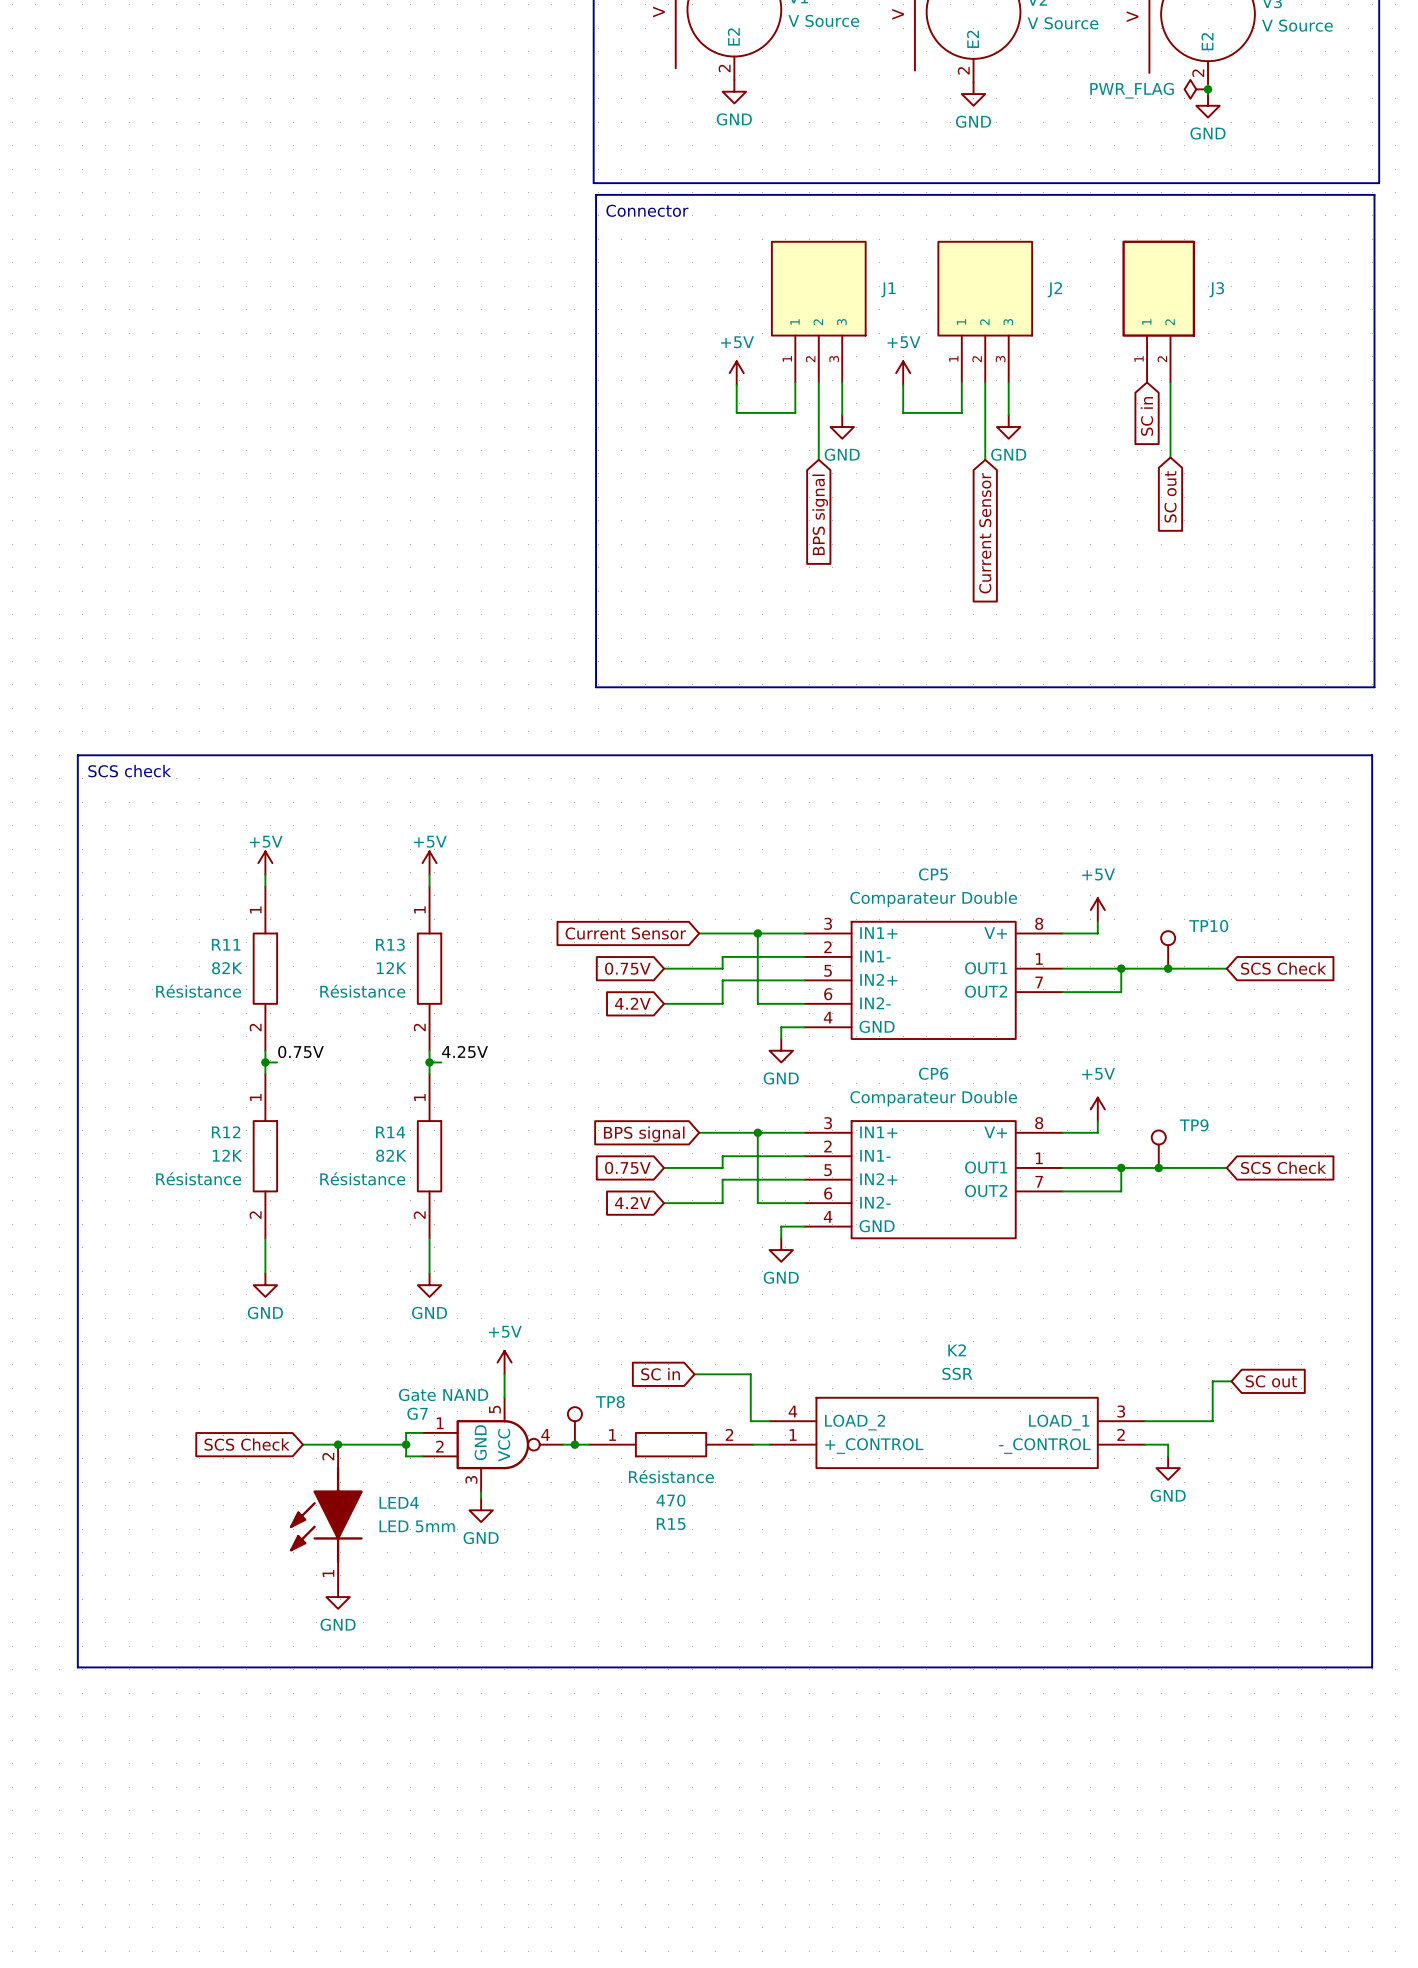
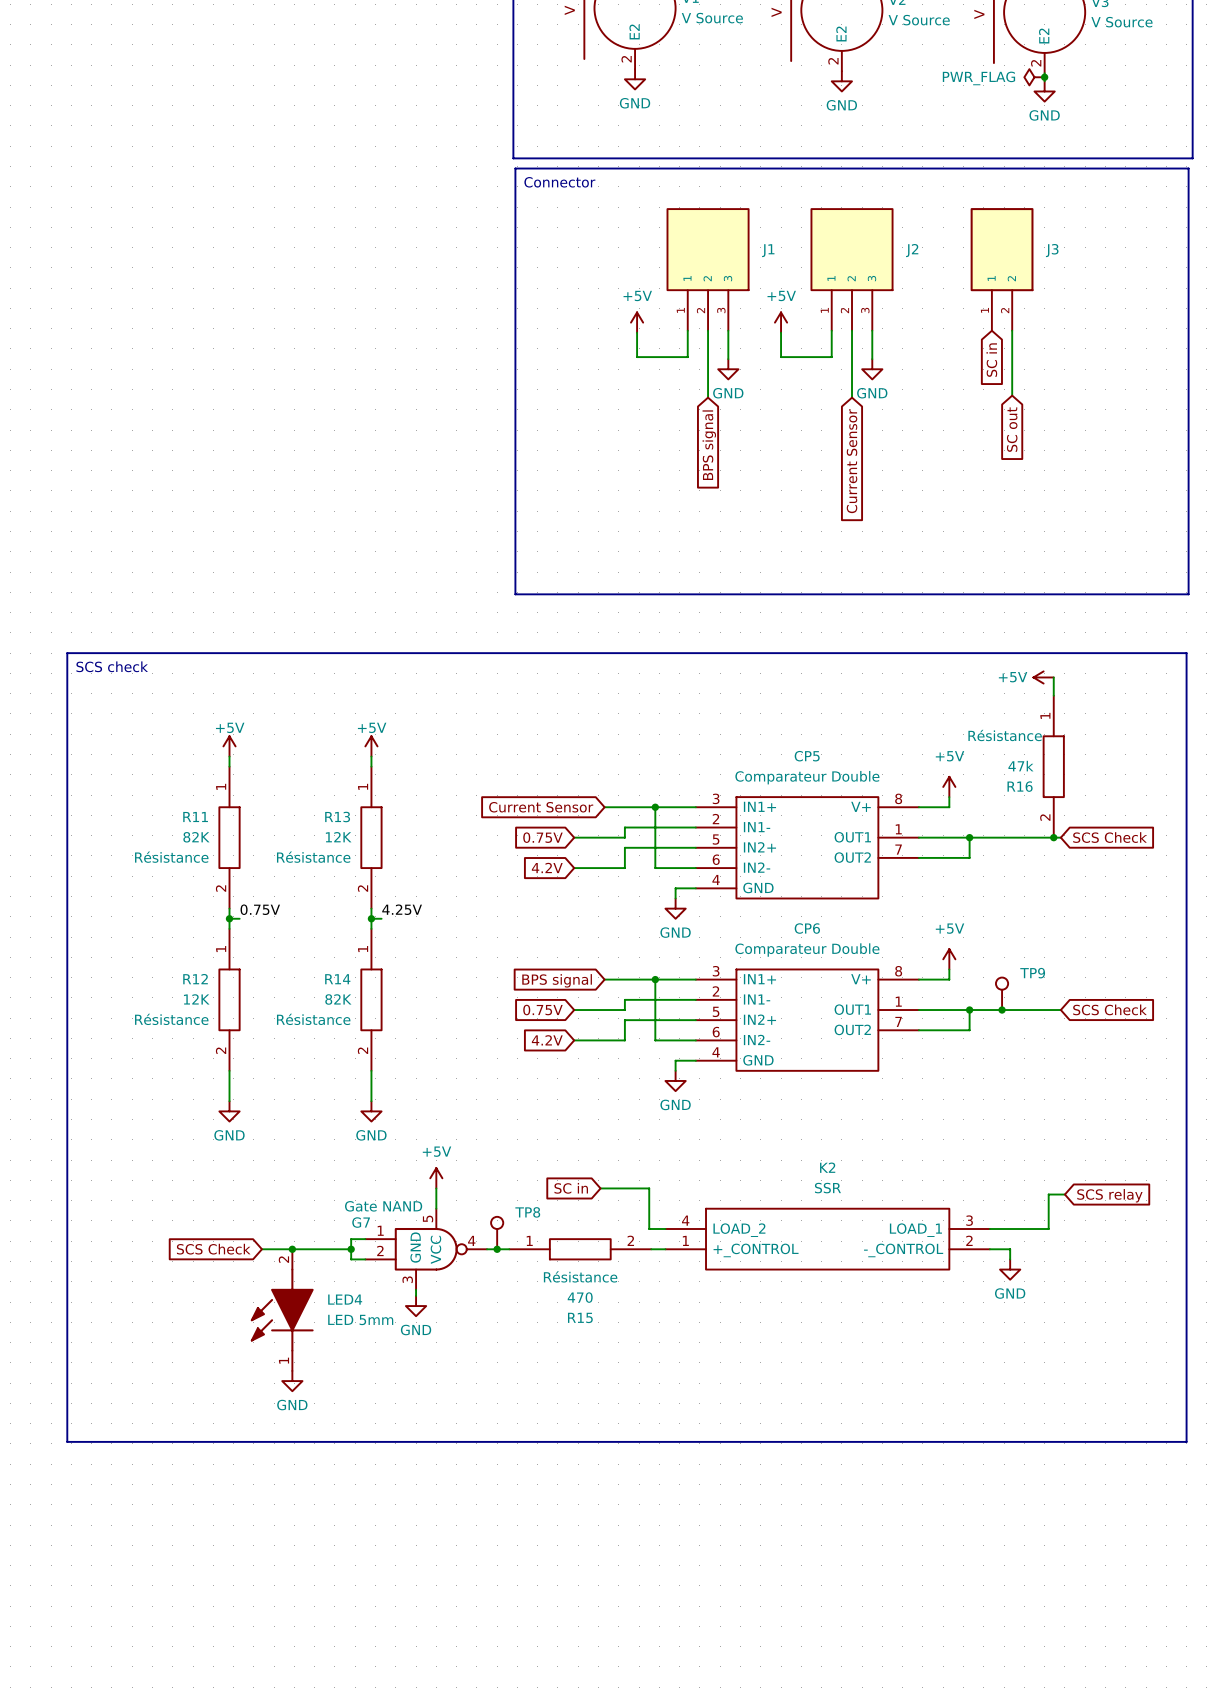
power symbol: none -> +5V (1043, 677)
wire: none -> (1053, 677) (1053, 695)
R16: none -> 47k (1053, 766)
TP10: (1168, 949) -> none
junction position: (1168, 968) -> (1053, 837)
global label: SC out (1271, 1381) -> SCS relay (1109, 1195)

